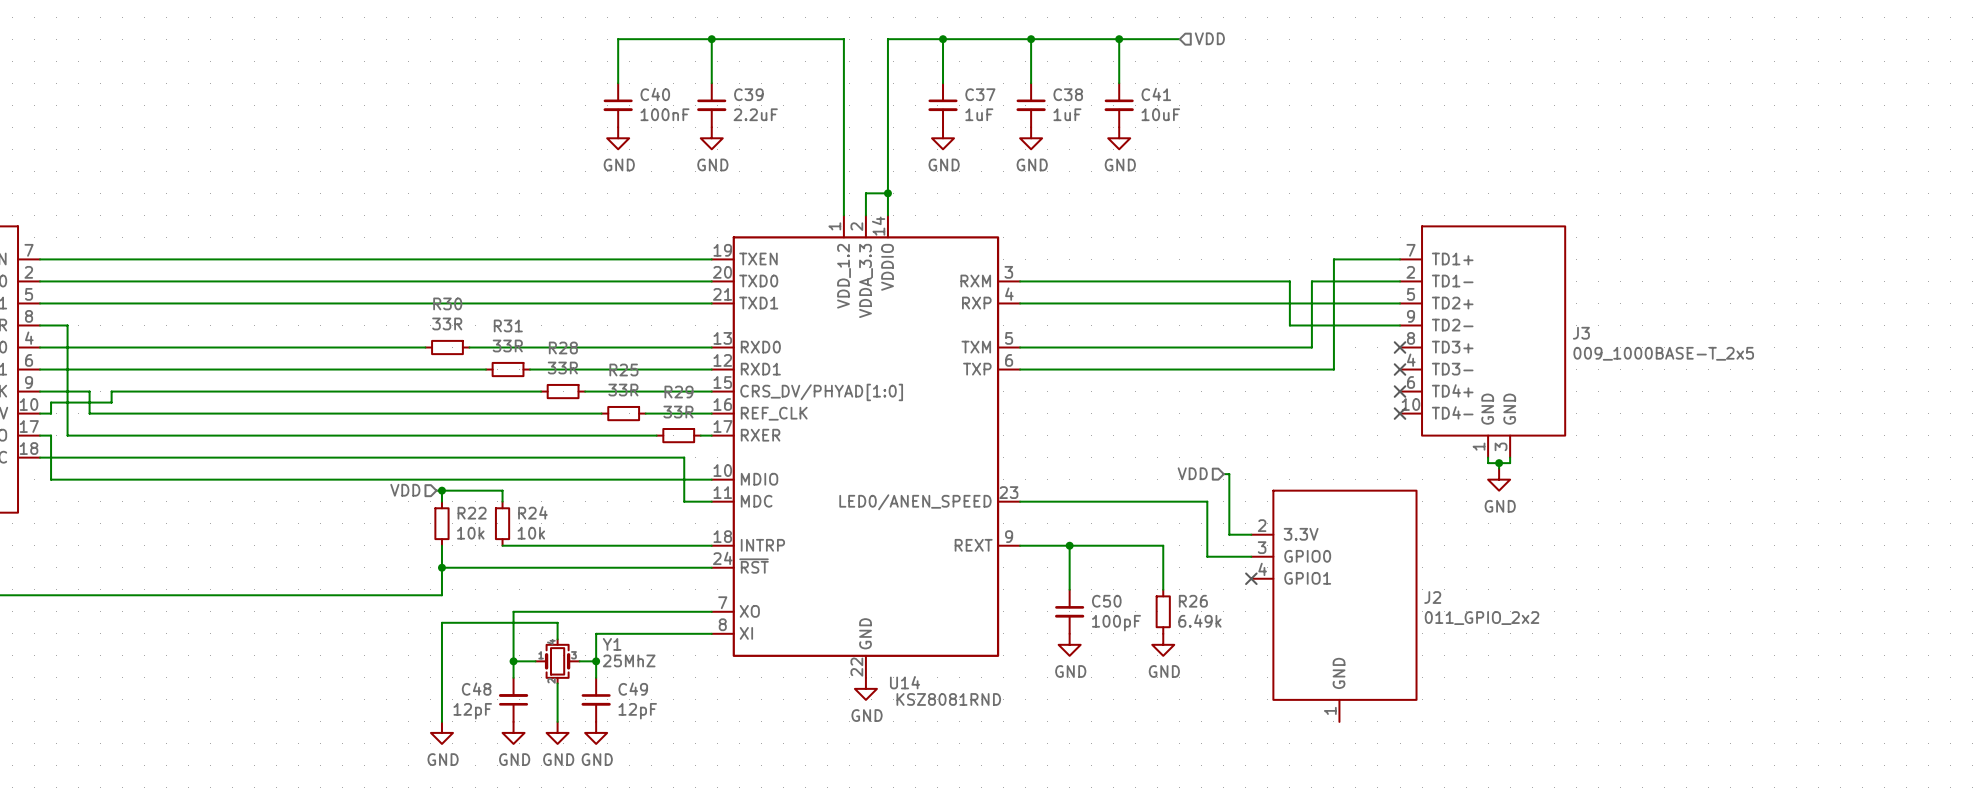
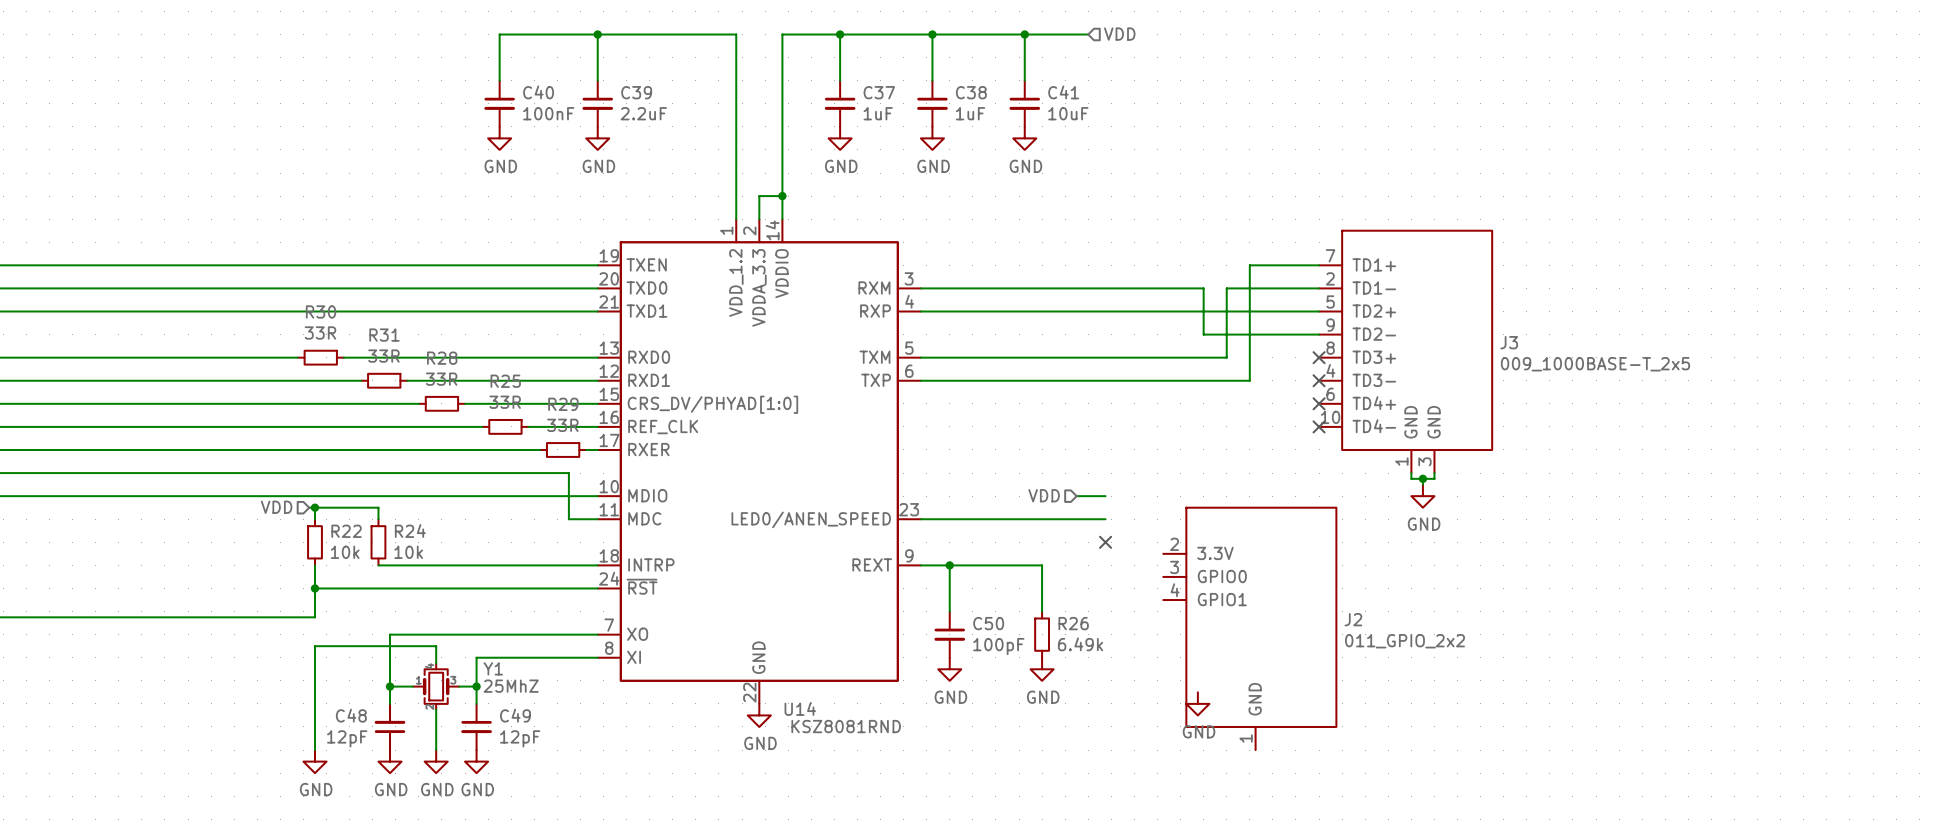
hierarchical label position: VDD (1192, 473) -> VDD (1044, 495)
wire: (1223, 474) (1229, 474) (1229, 534) (1251, 534) -> none
wire: none -> (1076, 496) (1105, 496)
wire: (1196, 501) (1207, 501) (1207, 556) (1251, 556) -> none
no-connect mark: none -> (1105, 542)
wire: (1069, 545) (1069, 589) -> (949, 565) (949, 611)
junction position: (1069, 545) -> (949, 565)
wire: (1135, 545) (1163, 545) (1163, 589) -> (1042, 565) (1042, 611)
no-connect mark: (1251, 578) -> none
C50 position: (1069, 611) -> (949, 634)
R26 position: (1163, 611) -> (1042, 634)
power symbol position: GND (1069, 644) -> GND (949, 669)
power symbol position: GND (1163, 644) -> GND (1042, 669)
power symbol: none -> GND (1197, 703)

